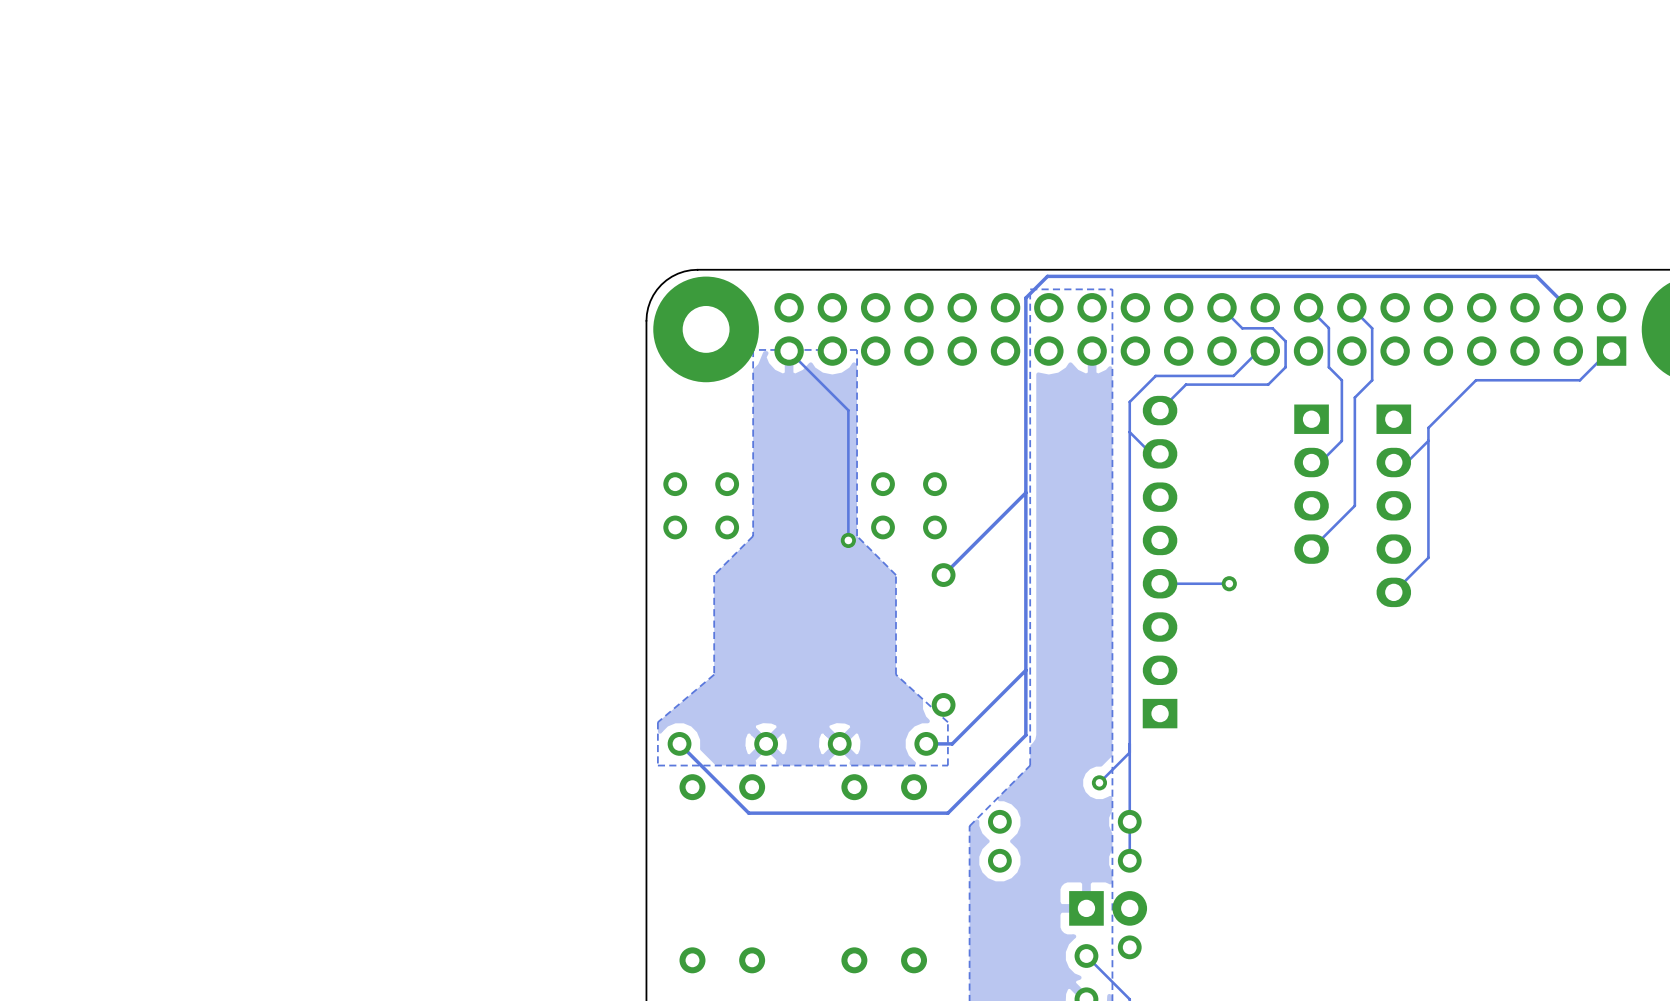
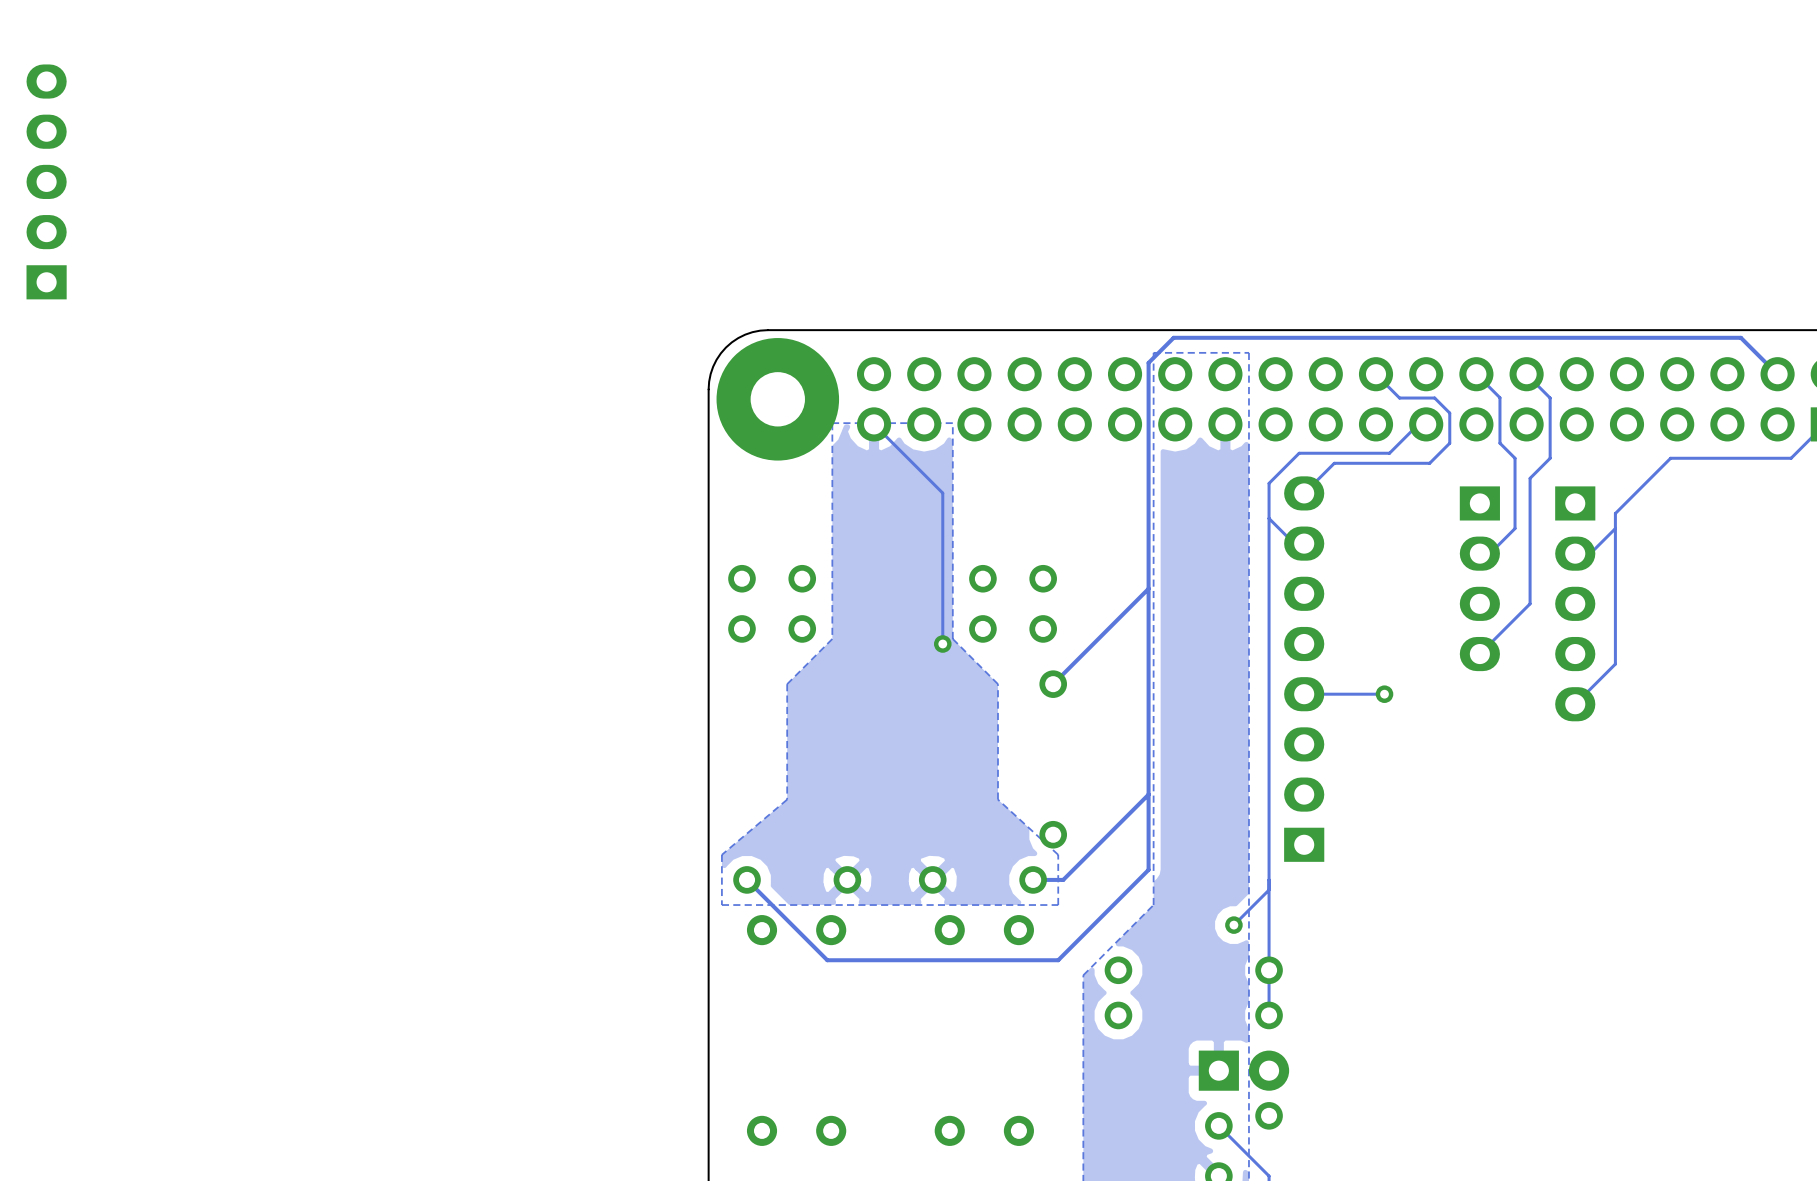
part: none -> (46, 181)

